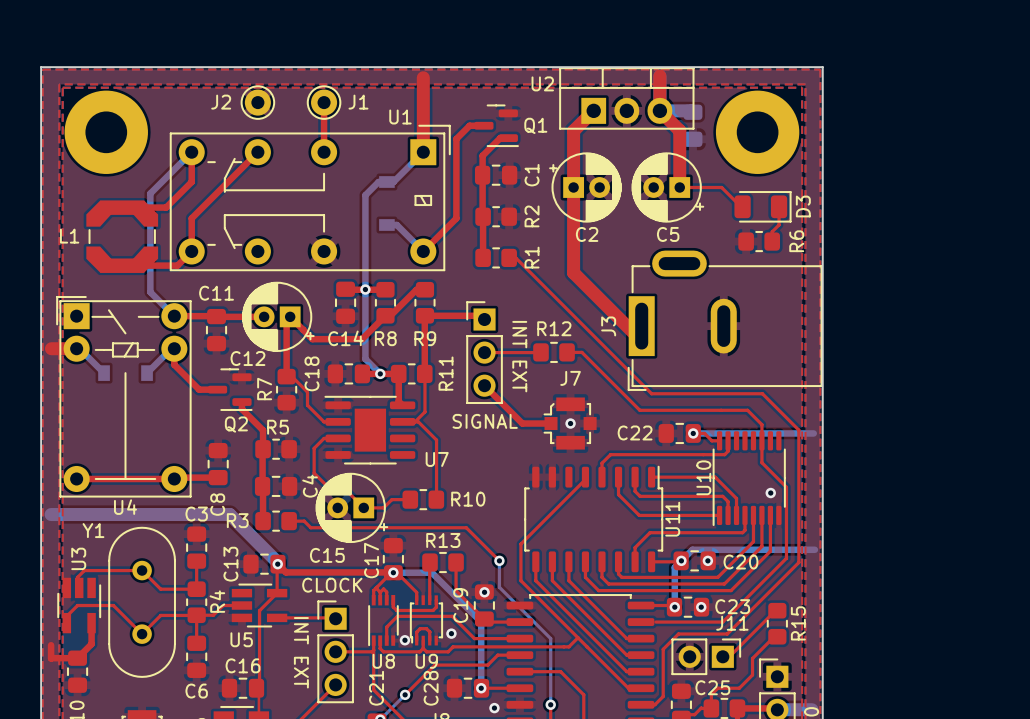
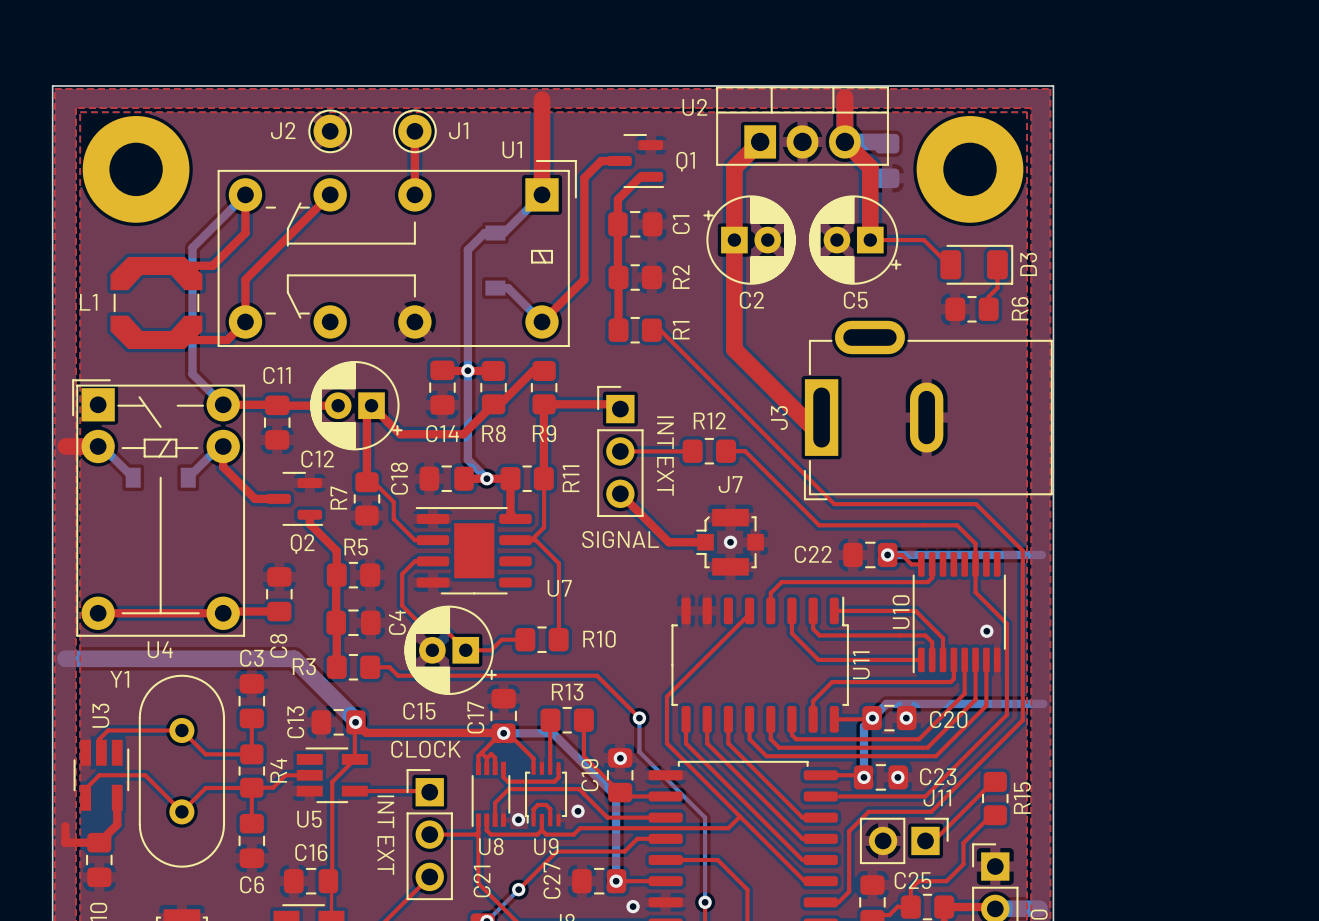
C28 name: C28 (431, 688) -> C27 (551, 880)

